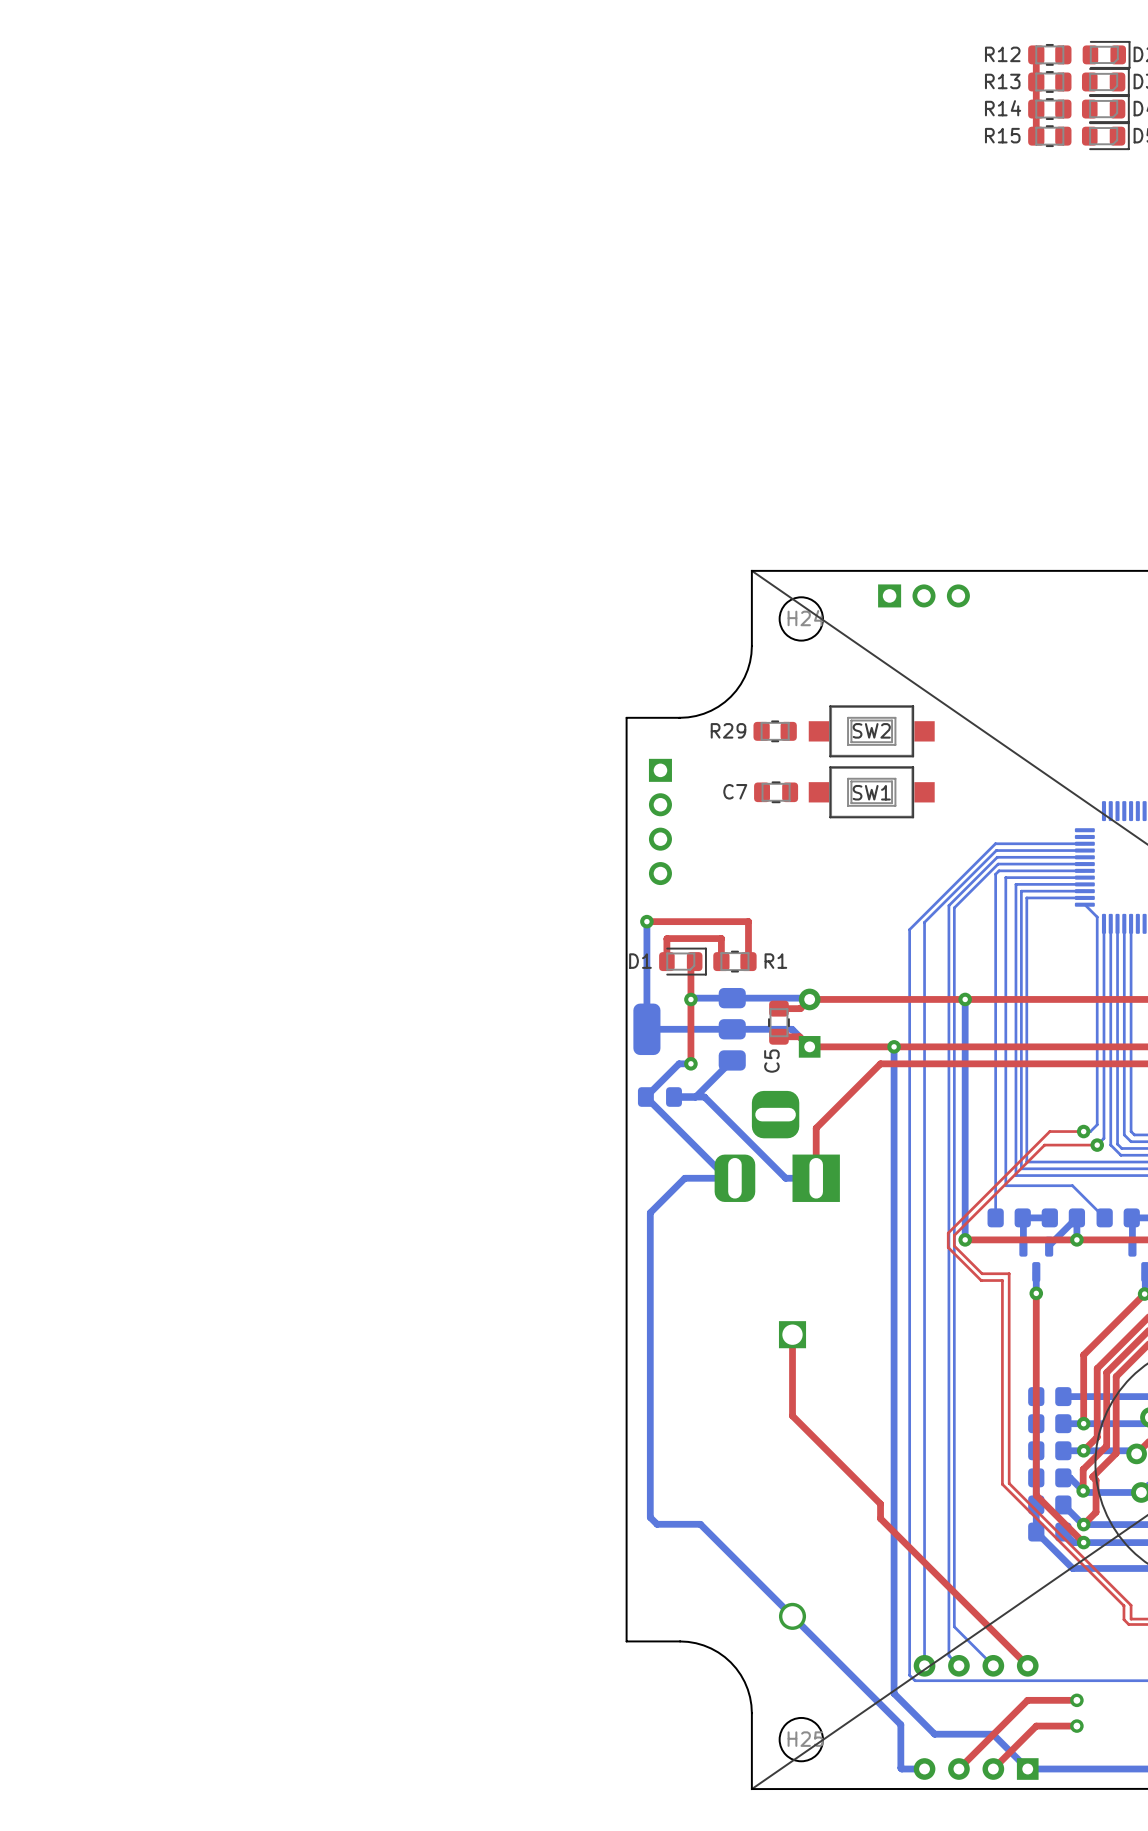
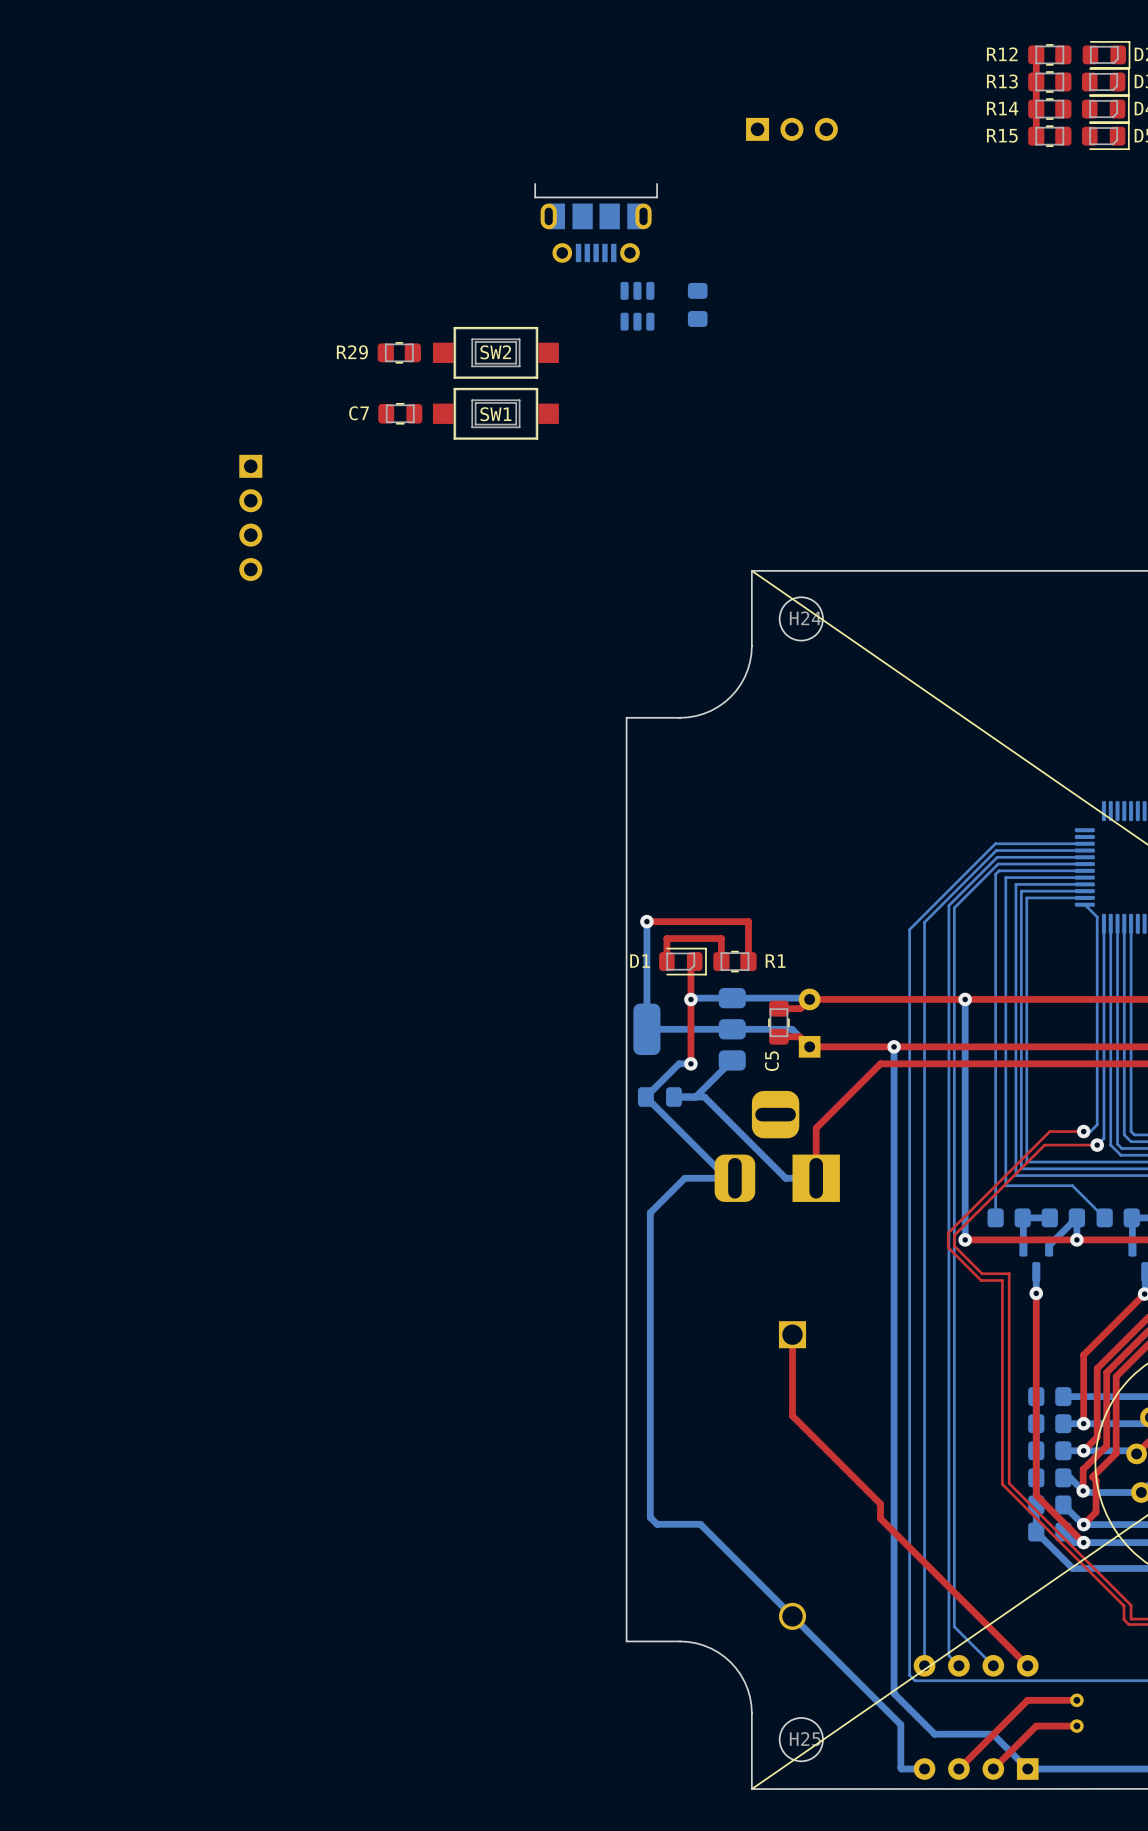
part: none -> (791, 129)
board edge: none -> (535, 183) (535, 197) (657, 197) (657, 183)
part: none -> (596, 233)
part: none -> (697, 304)
part: none -> (637, 306)
part: none -> (250, 517)
part: (924, 595) -> none
R29 position: (775, 731) -> (399, 352)
SW2 position: (871, 731) -> (495, 352)
C7 position: (776, 792) -> (400, 413)
SW1 position: (871, 792) -> (495, 413)
part: (660, 821) -> none

